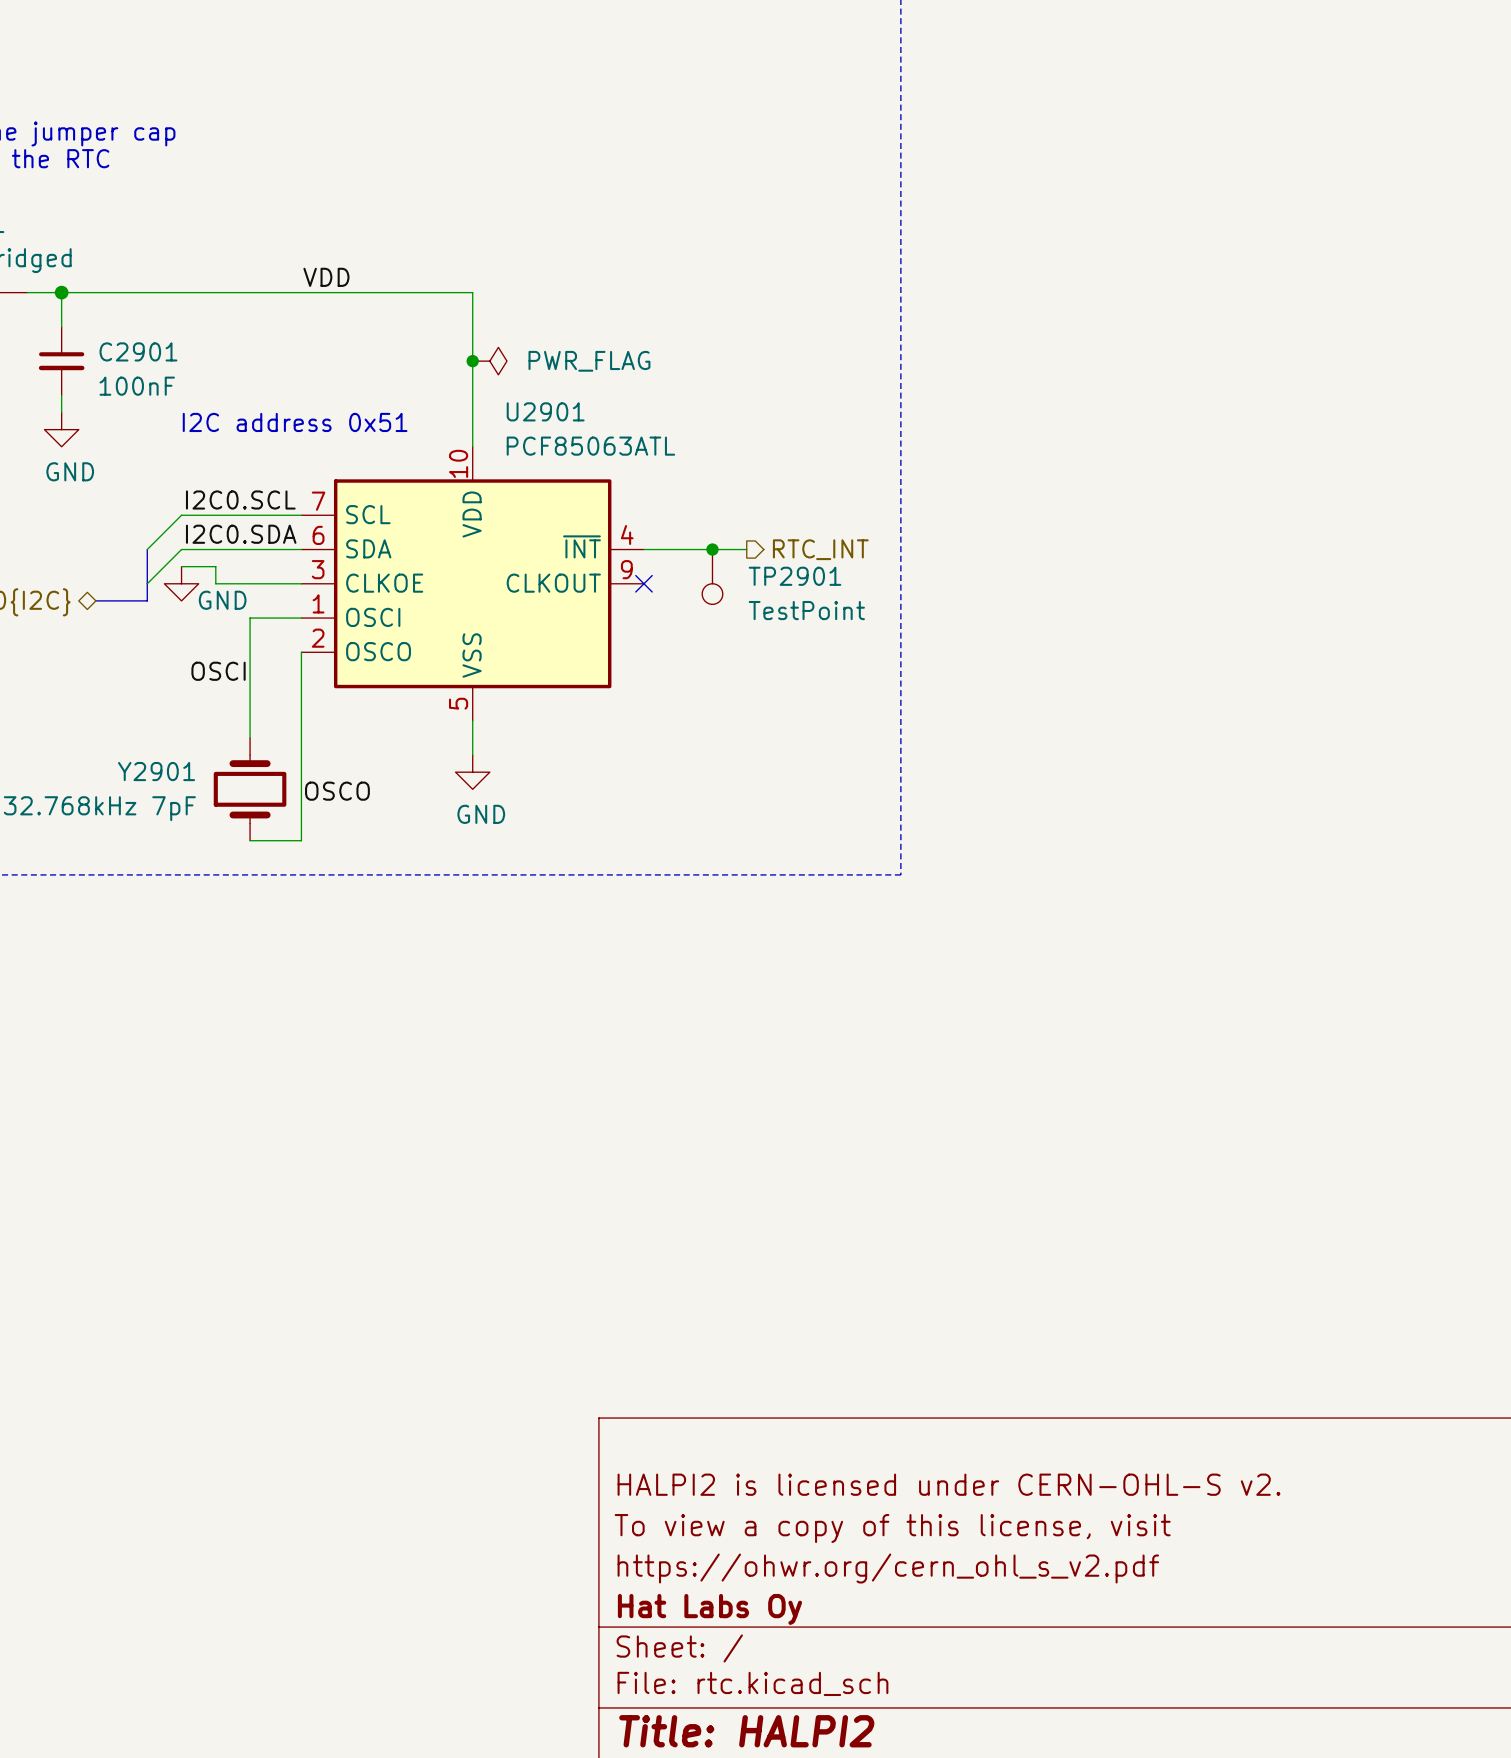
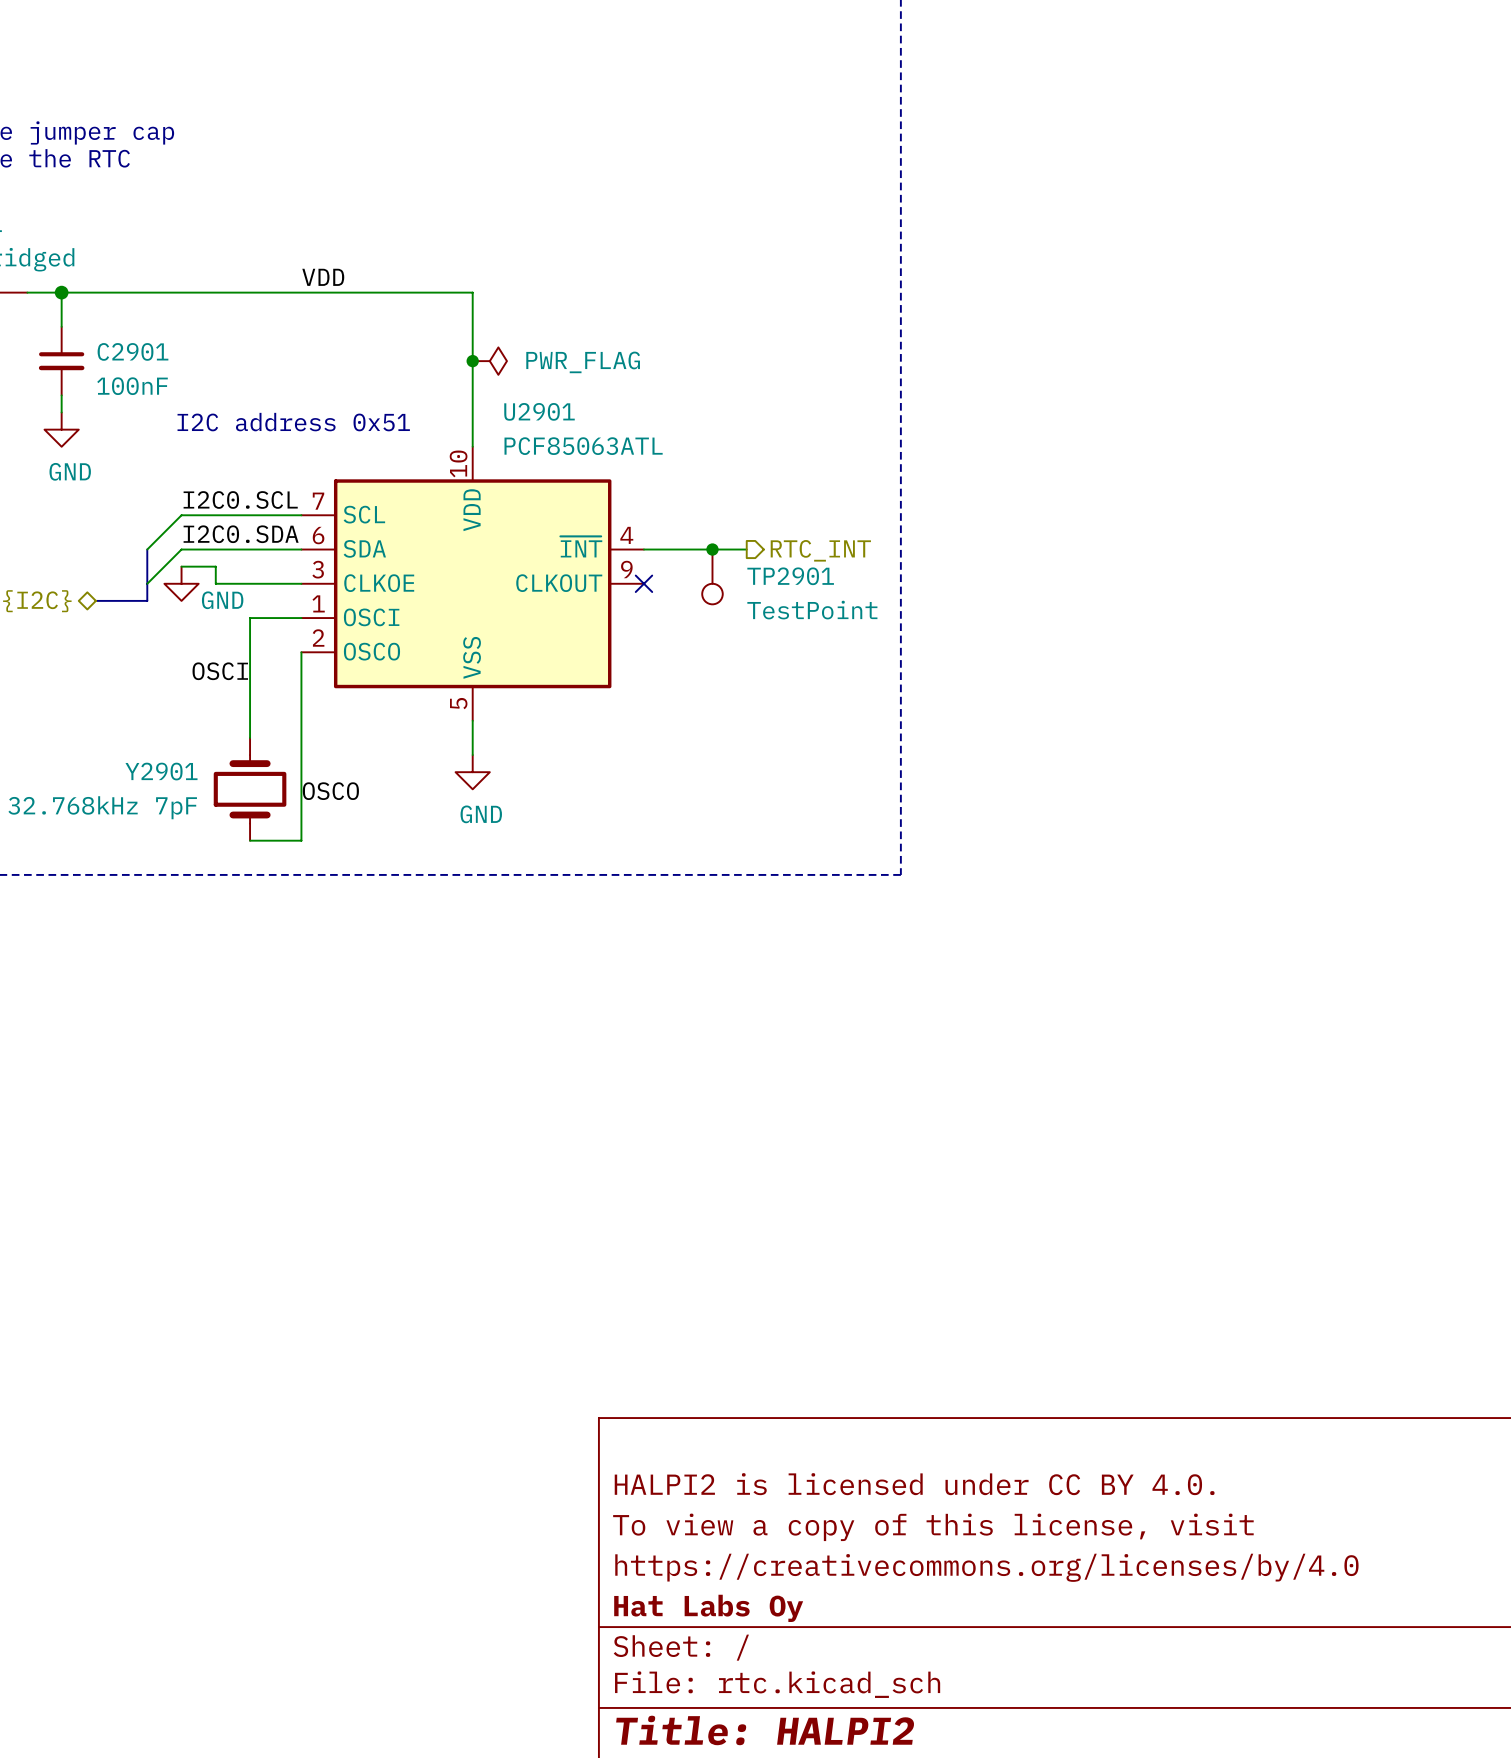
title block: HALPI2 is licensed under CERN-OHL-S v2. (948, 1484) -> HALPI2 is licensed under CC BY 4.0. (914, 1484)
title block: https://ohwr.org/cern_ohl_s_v2.pdf (888, 1568) -> https://creativecommons.org/licenses/by/4.0 (986, 1567)

